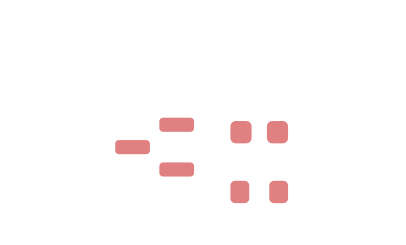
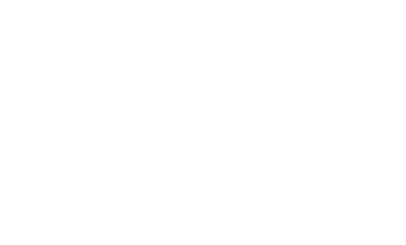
part: (259, 132) -> none
part: (154, 147) -> none
part: (259, 191) -> none

